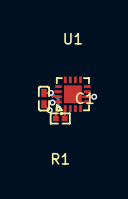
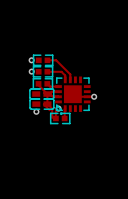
U1 name: U1 (73, 38) -> none
via: none -> (31, 60)
part: none -> (43, 60)
top track: none -> (47, 60) (56, 60) (70, 74) (70, 79)
via: none -> (31, 71)
part: none -> (43, 71)
top track: none -> (47, 71) (61, 71) (65, 75) (65, 79)
top track: none -> (38, 83) (47, 94) (47, 104) (52, 108) (52, 117)
part: none -> (42, 83)
top track: none -> (47, 83) (50, 86) (58, 86)
bottom track: (50, 92) (58, 99) (58, 108) -> none
via: (50, 92) -> none
part: none -> (41, 94)
C1: (43, 98) -> none
via: (52, 102) -> none
part: none -> (41, 104)
via: (49, 110) -> none
via: none -> (36, 111)
R1 name: R1 (60, 158) -> none

